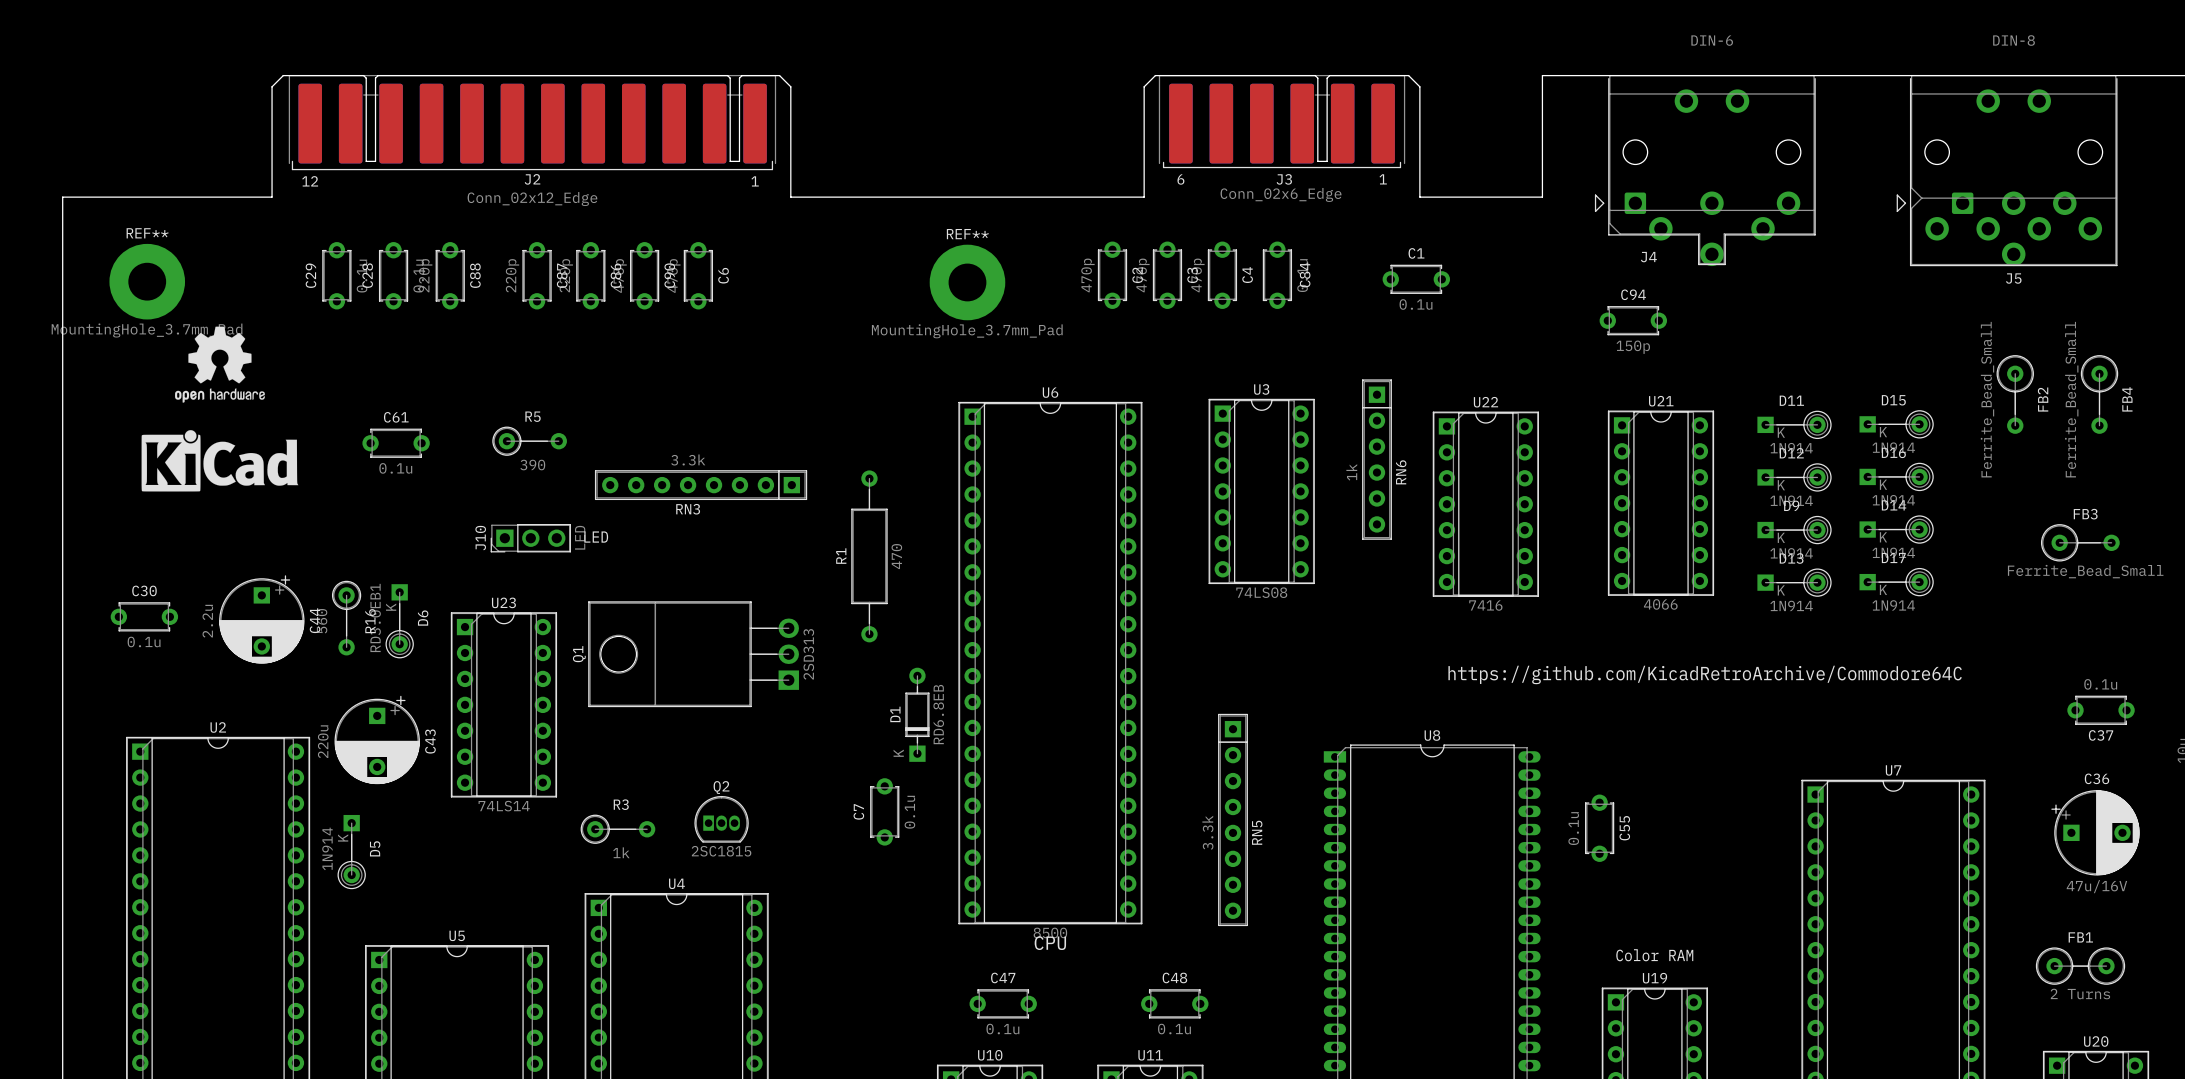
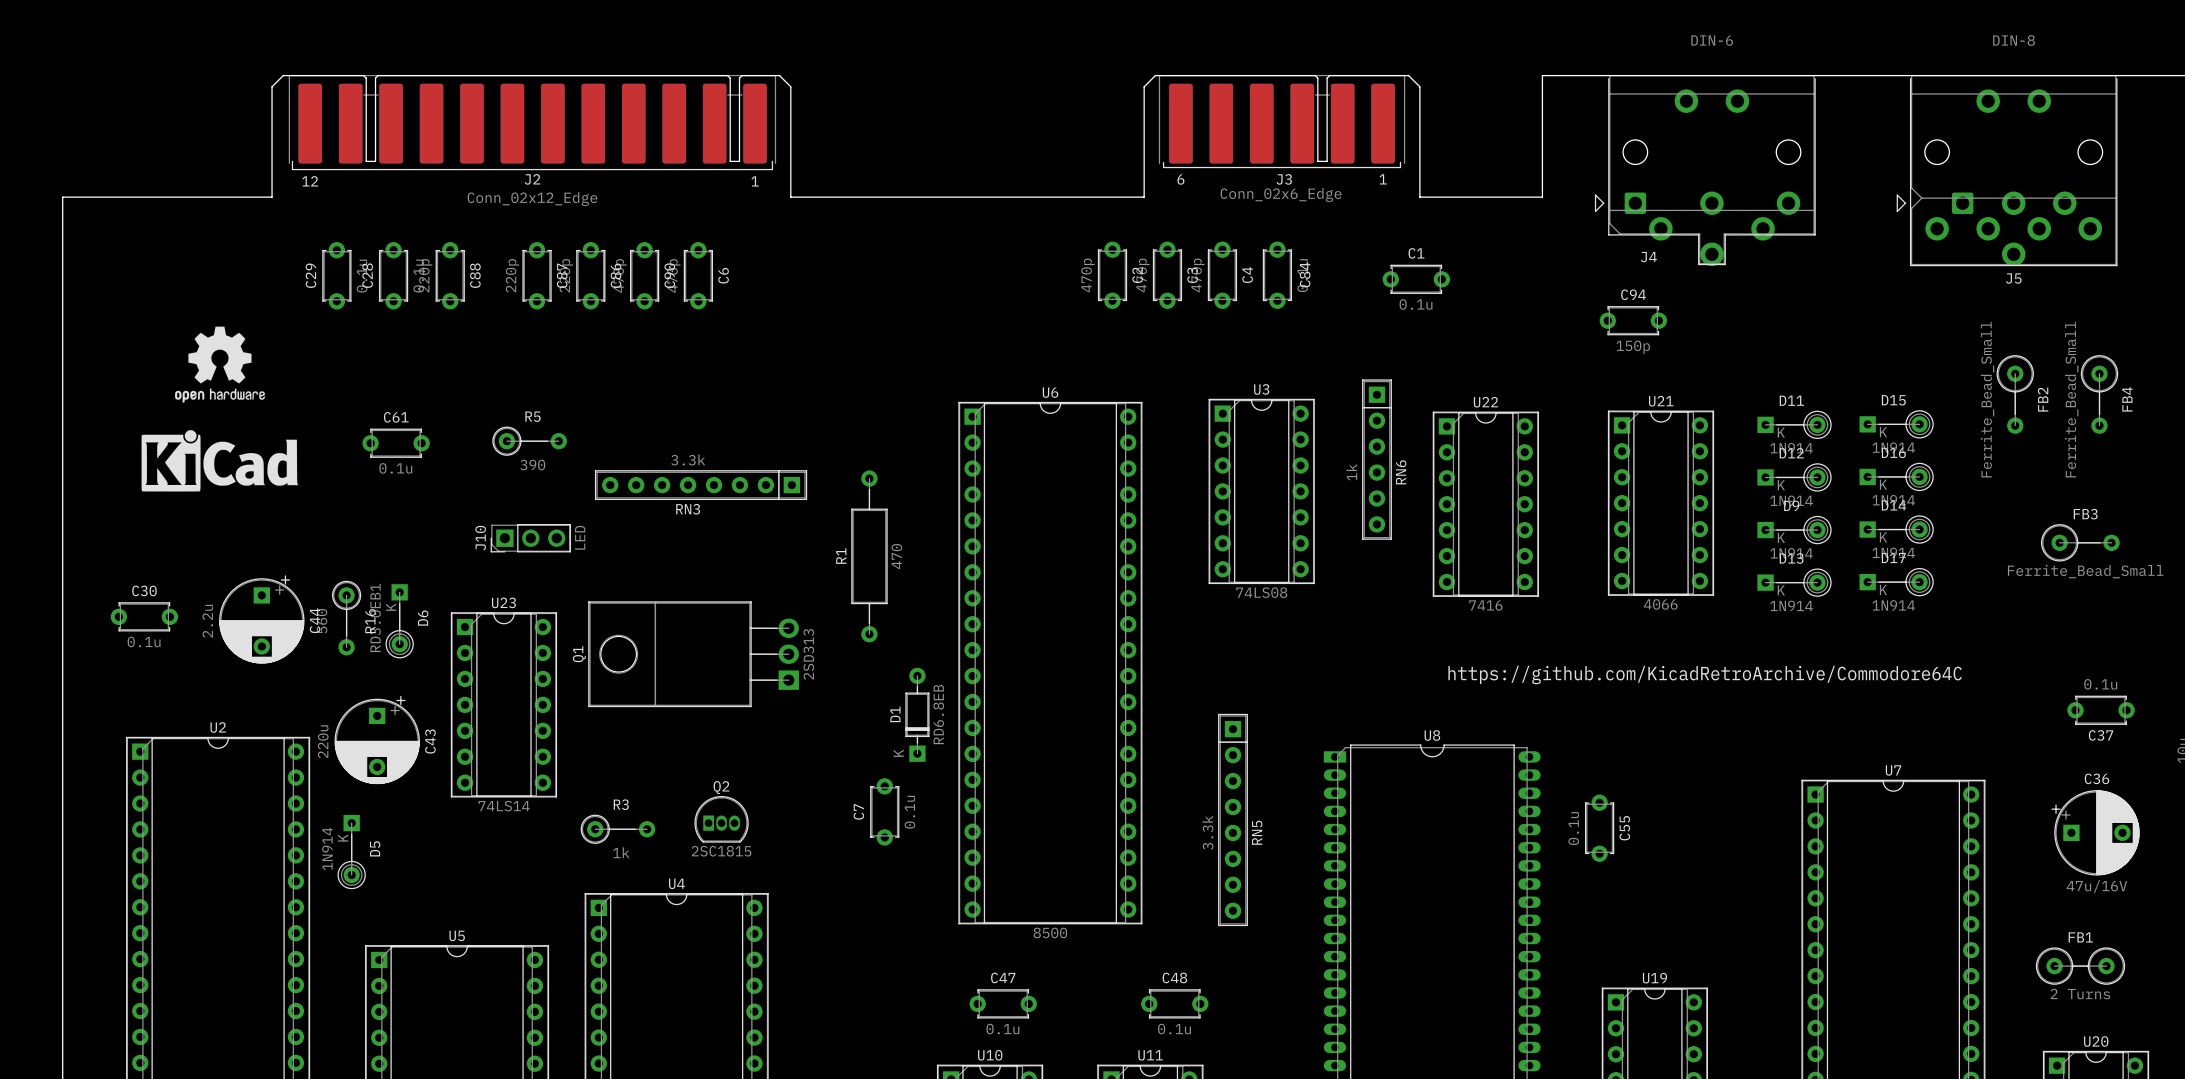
REF**: MountingHole_3.7mm_Pad (147, 281) -> none
REF**: MountingHole_3.7mm_Pad (967, 282) -> none
text: LED (596, 537) -> none
text: CPU (1050, 943) -> none
text: Color RAM (1654, 955) -> none

